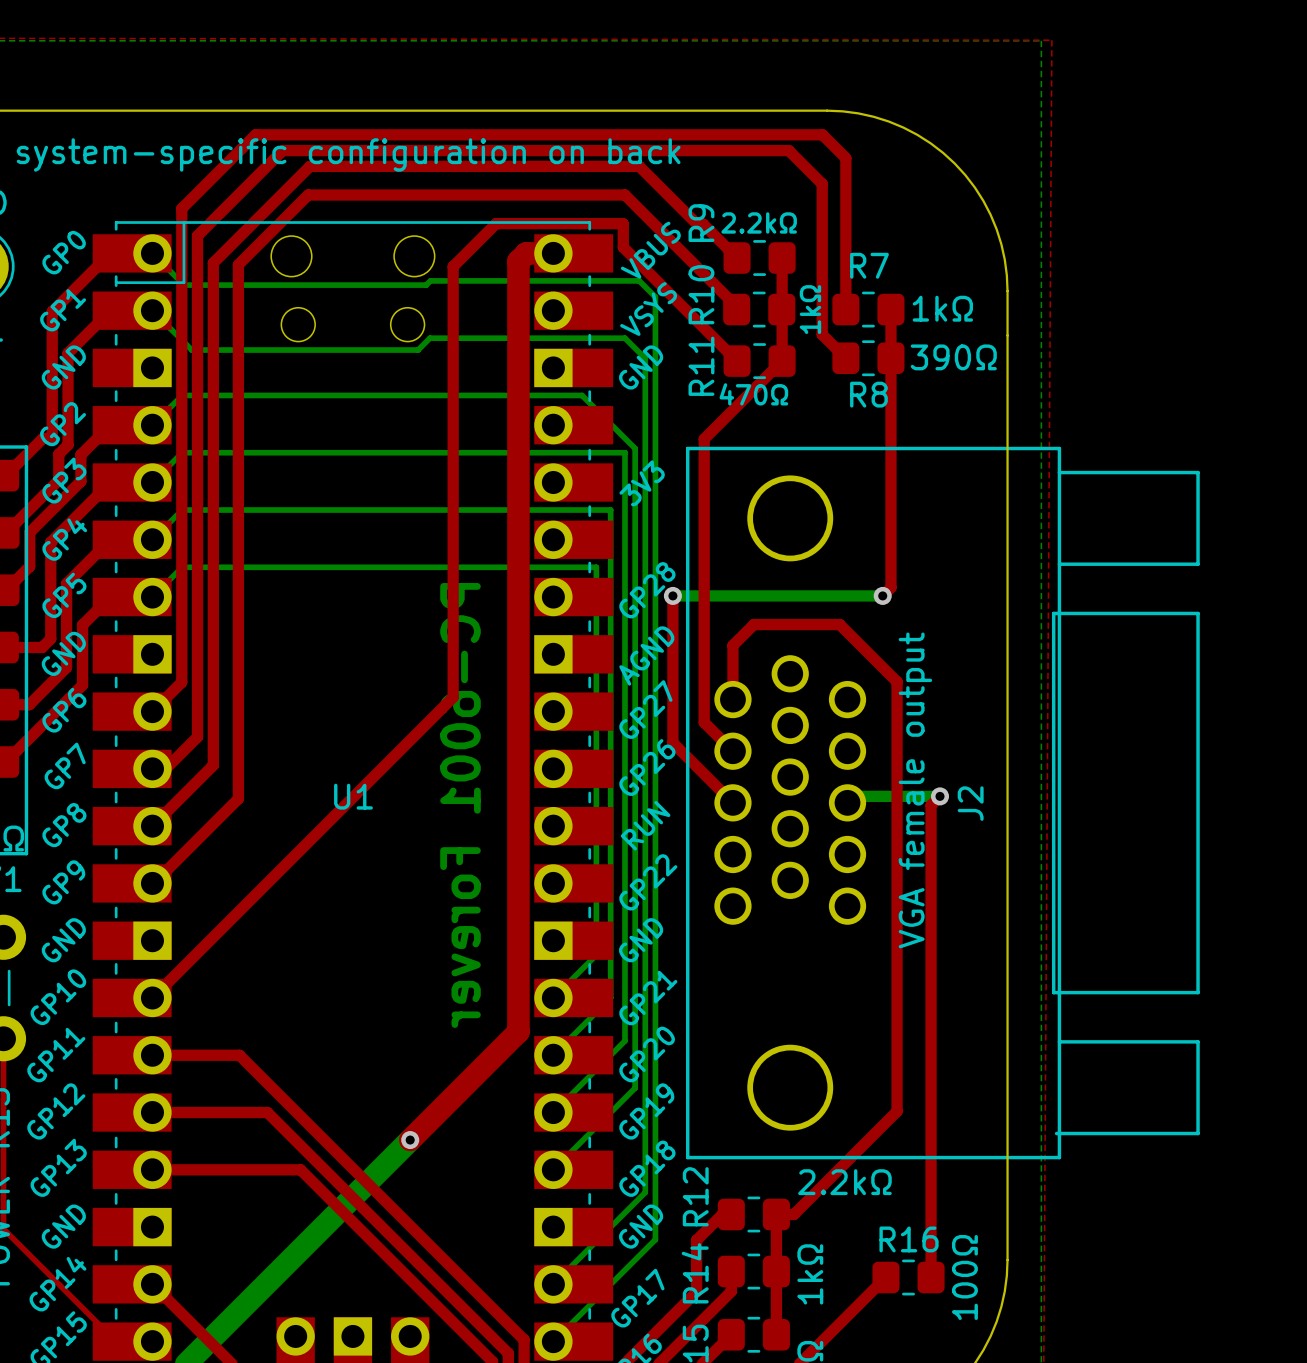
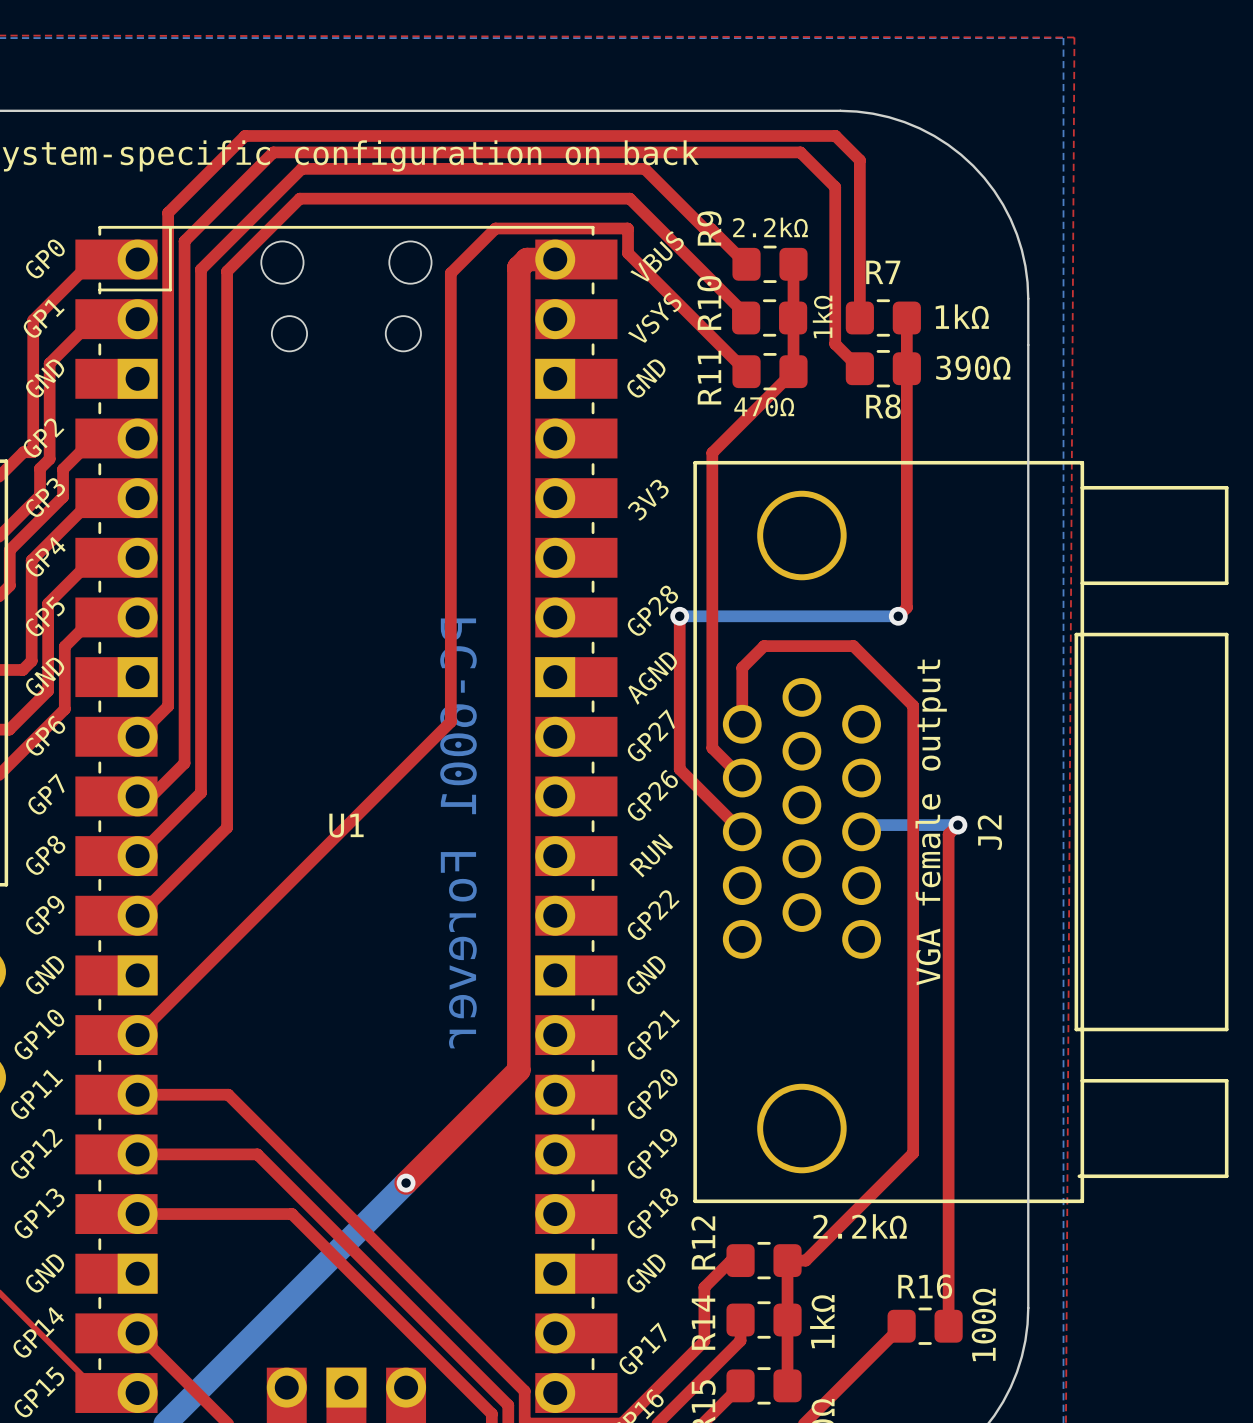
bottom track: (152, 253) (184, 285) (426, 285) (430, 280) (639, 280) (655, 297) (655, 1239) (553, 1341) -> none
bottom track: (152, 310) (191, 350) (418, 350) (429, 338) (624, 338) (645, 358) (645, 1192) (553, 1284) -> none
bottom track: (152, 425) (182, 395) (582, 395) (635, 448) (635, 1088) (553, 1169) -> none
bottom track: (152, 482) (182, 452) (624, 452) (624, 1040) (553, 1112) -> none
bottom track: (152, 539) (182, 510) (610, 510) (610, 997) (553, 1055) -> none
bottom track: (152, 597) (182, 567) (596, 567) (596, 955) (553, 997) -> none

